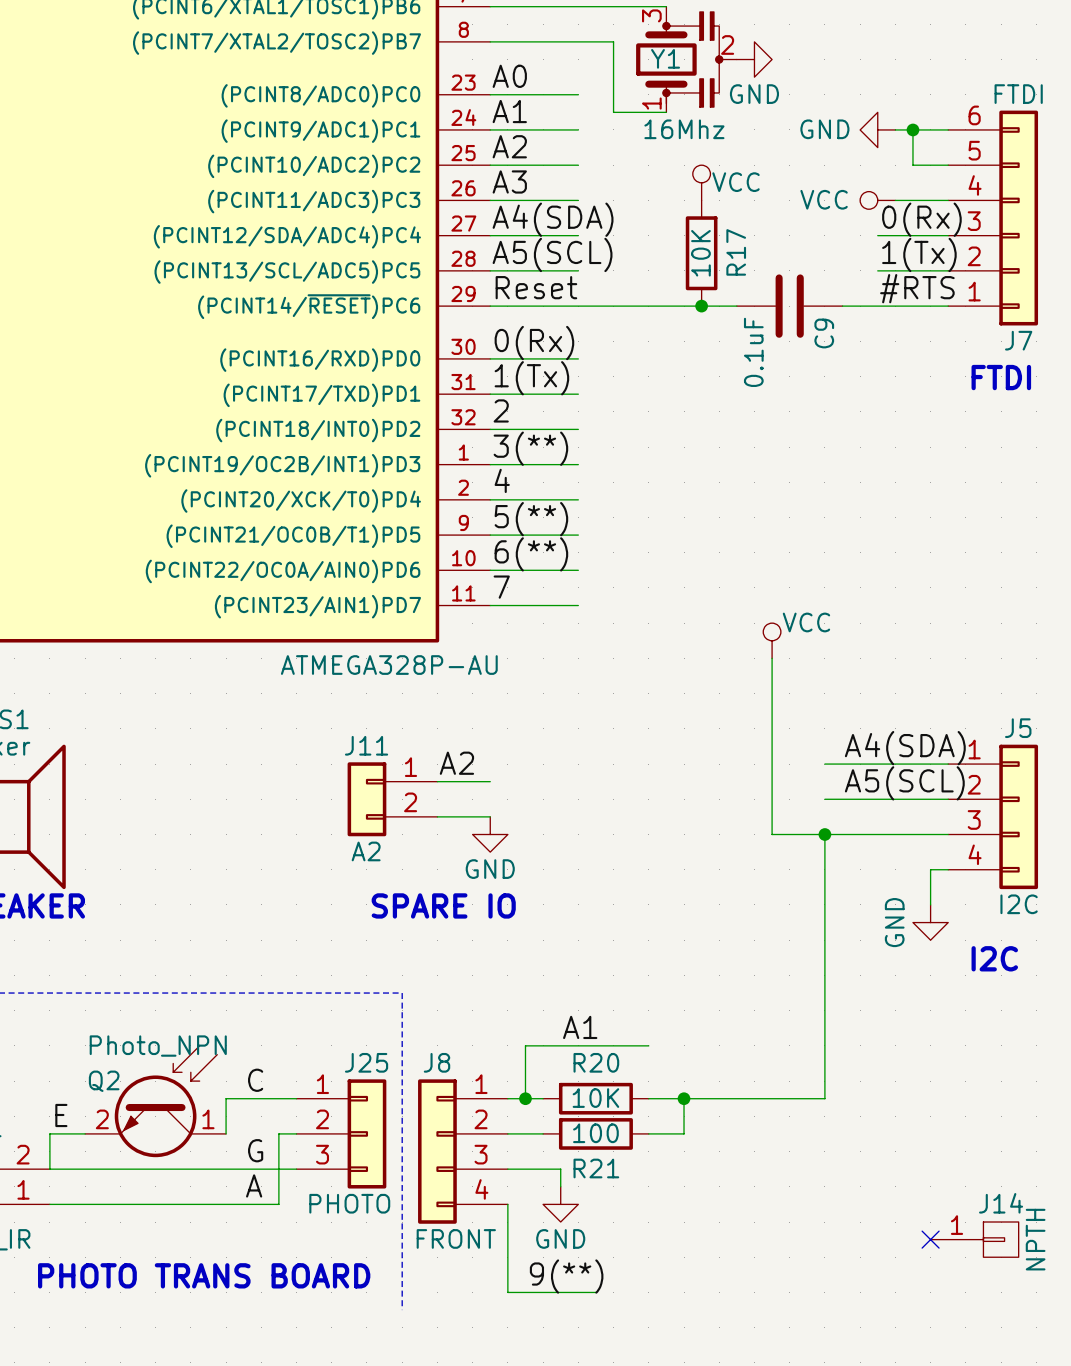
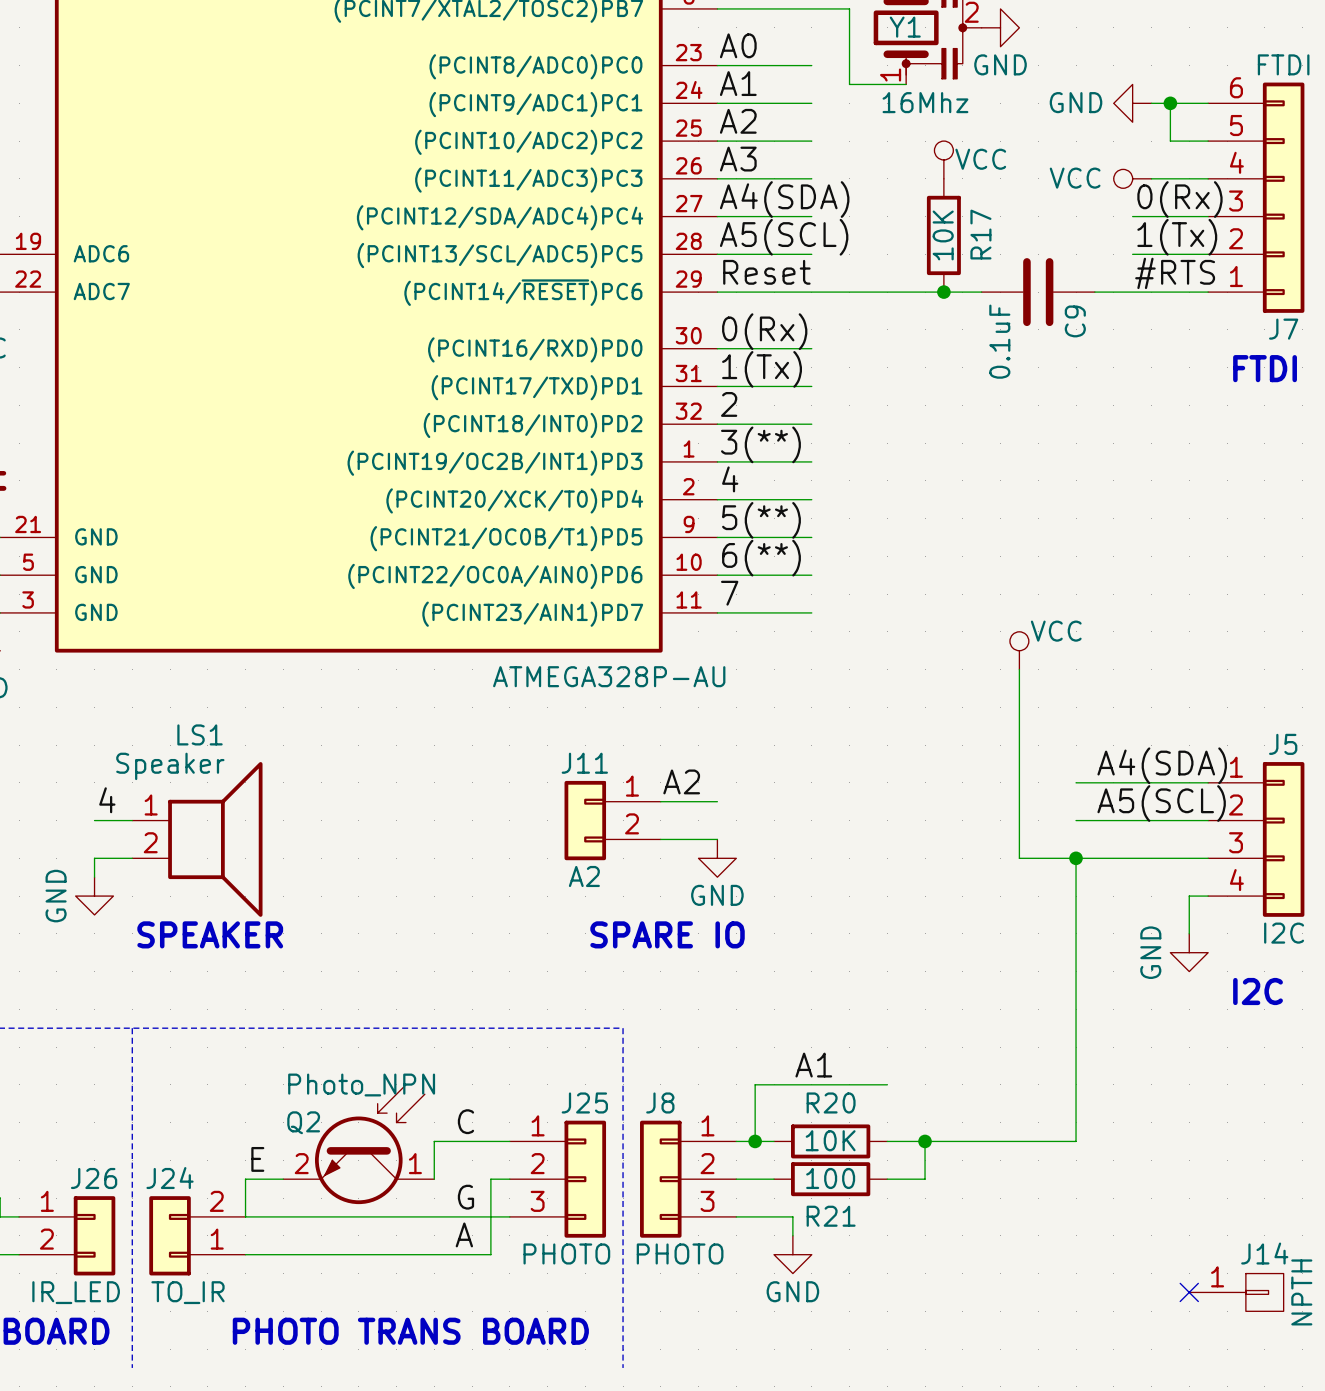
J8 symbol: [418, 1079, 508, 1224] -> [640, 1120, 737, 1238]
wire: (507, 1204) (507, 1292) (595, 1292) -> none
J8 value: FRONT (456, 1238) -> PHOTO (680, 1253)
label: 9(**) (566, 1276) -> none

